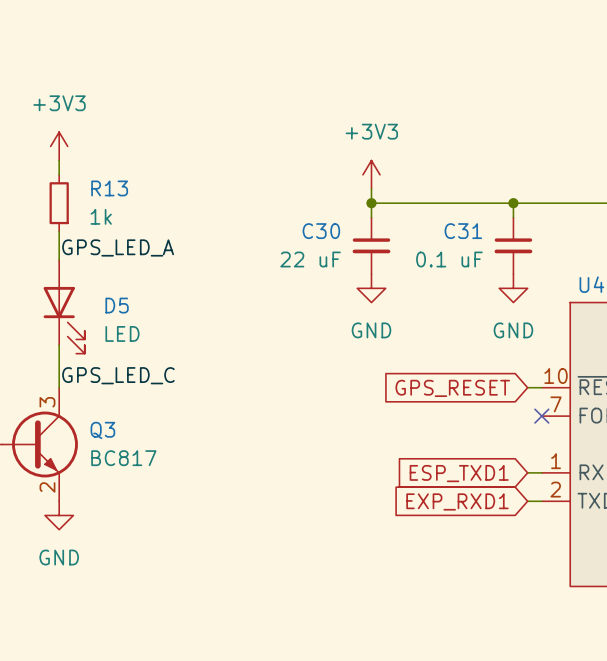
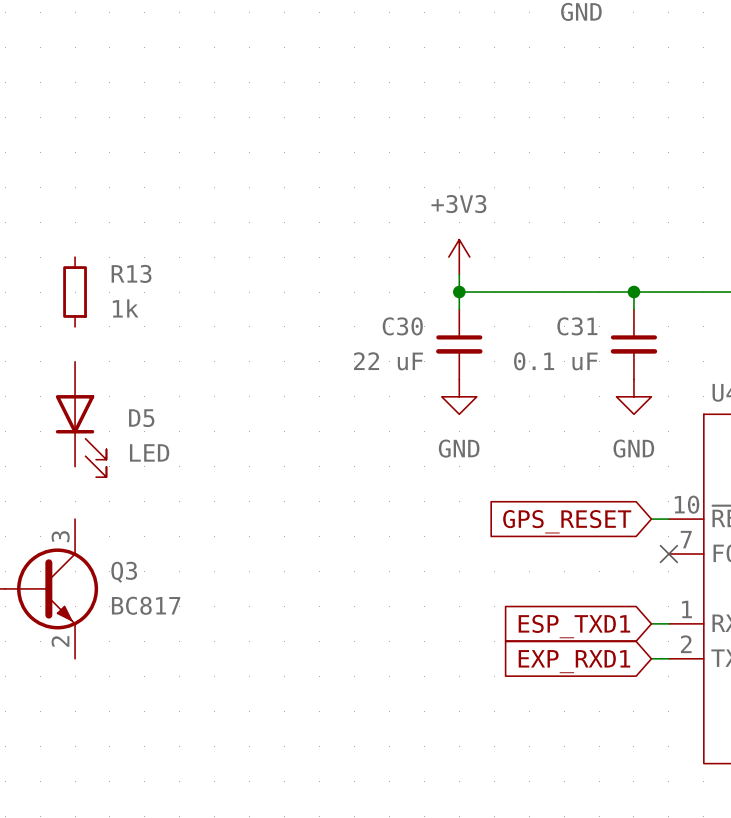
power symbol: +3V3 (59, 146) -> none
wire: (59, 160) (59, 174) -> none
wire: (59, 231) (59, 259) -> none
label: GPS_LED_A (118, 247) -> none
wire: (59, 345) (59, 387) -> none
label: GPS_LED_C (118, 375) -> none
power symbol: GND (59, 515) -> none

